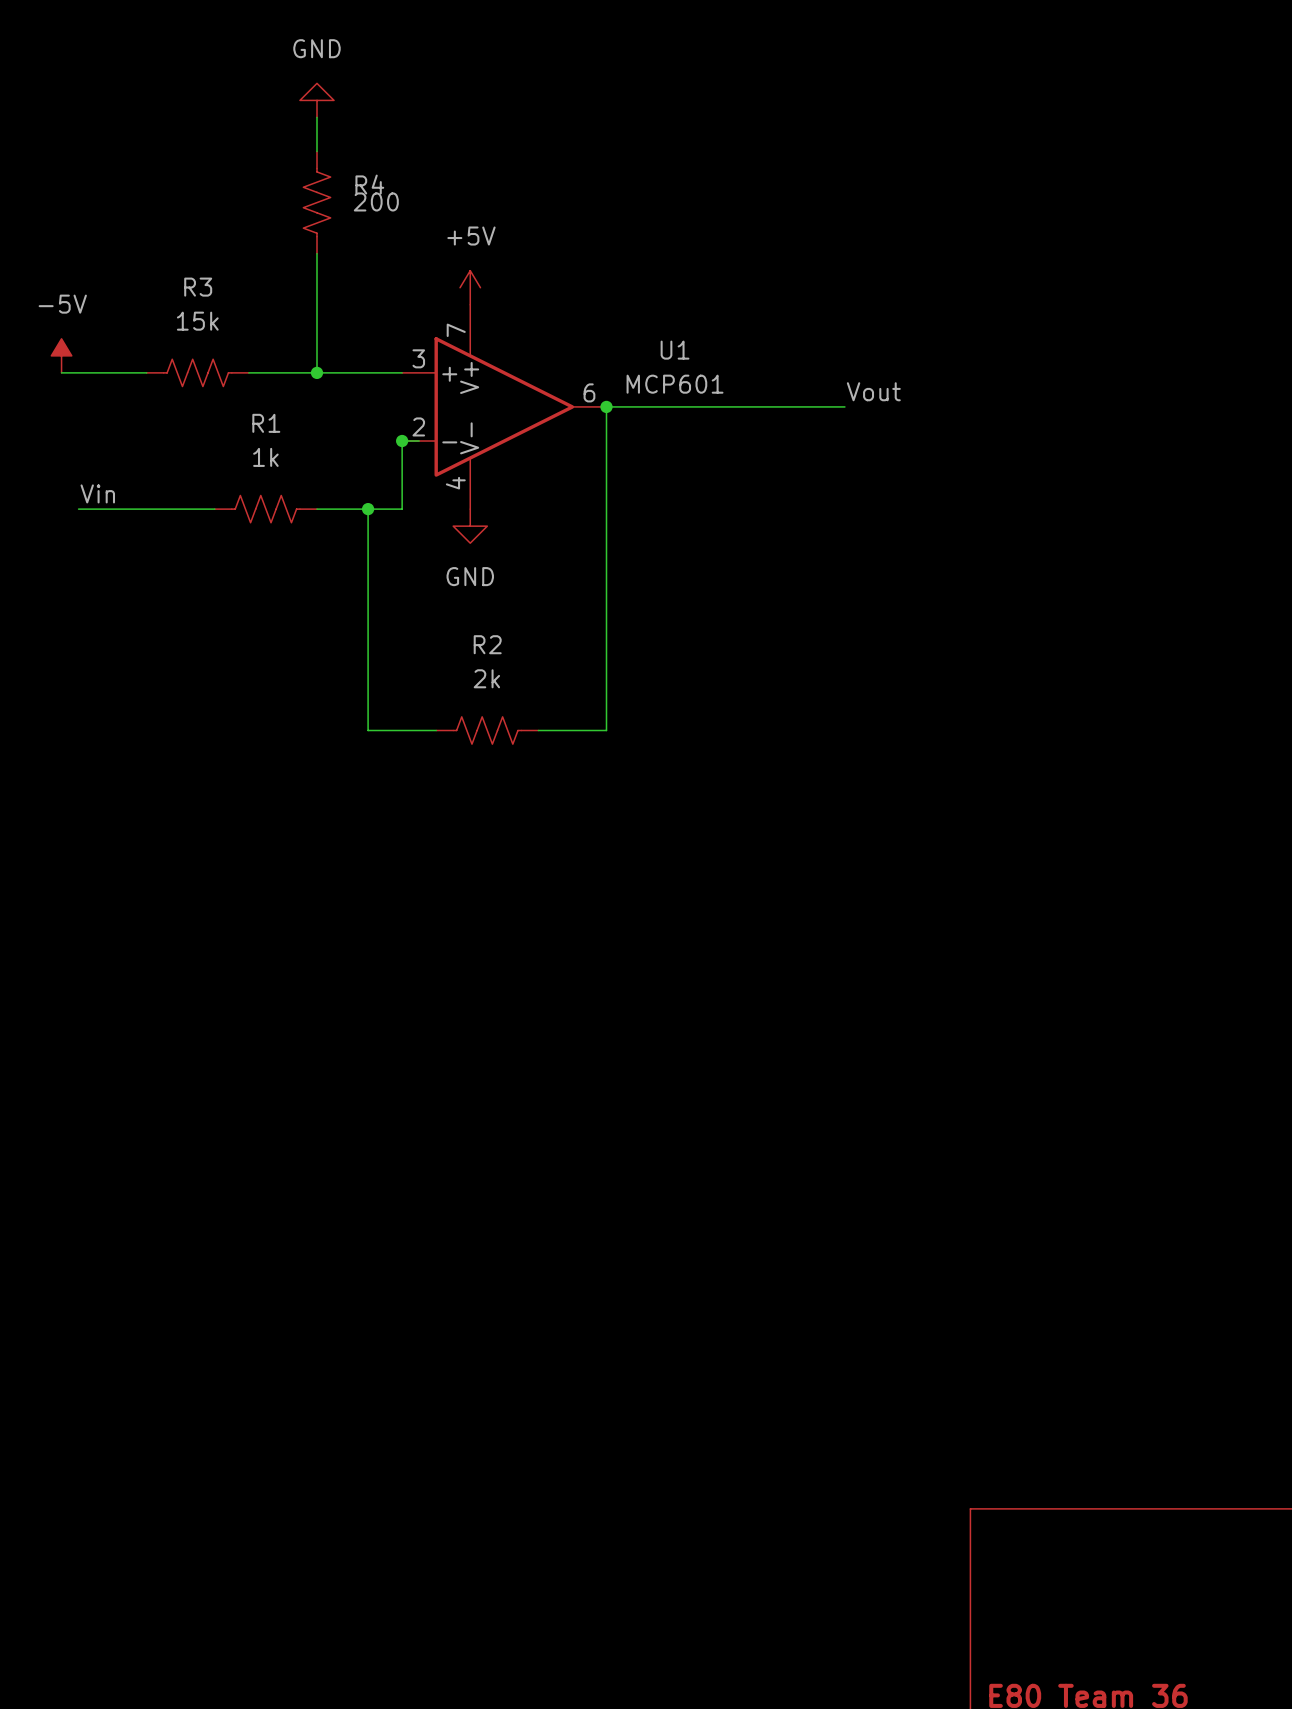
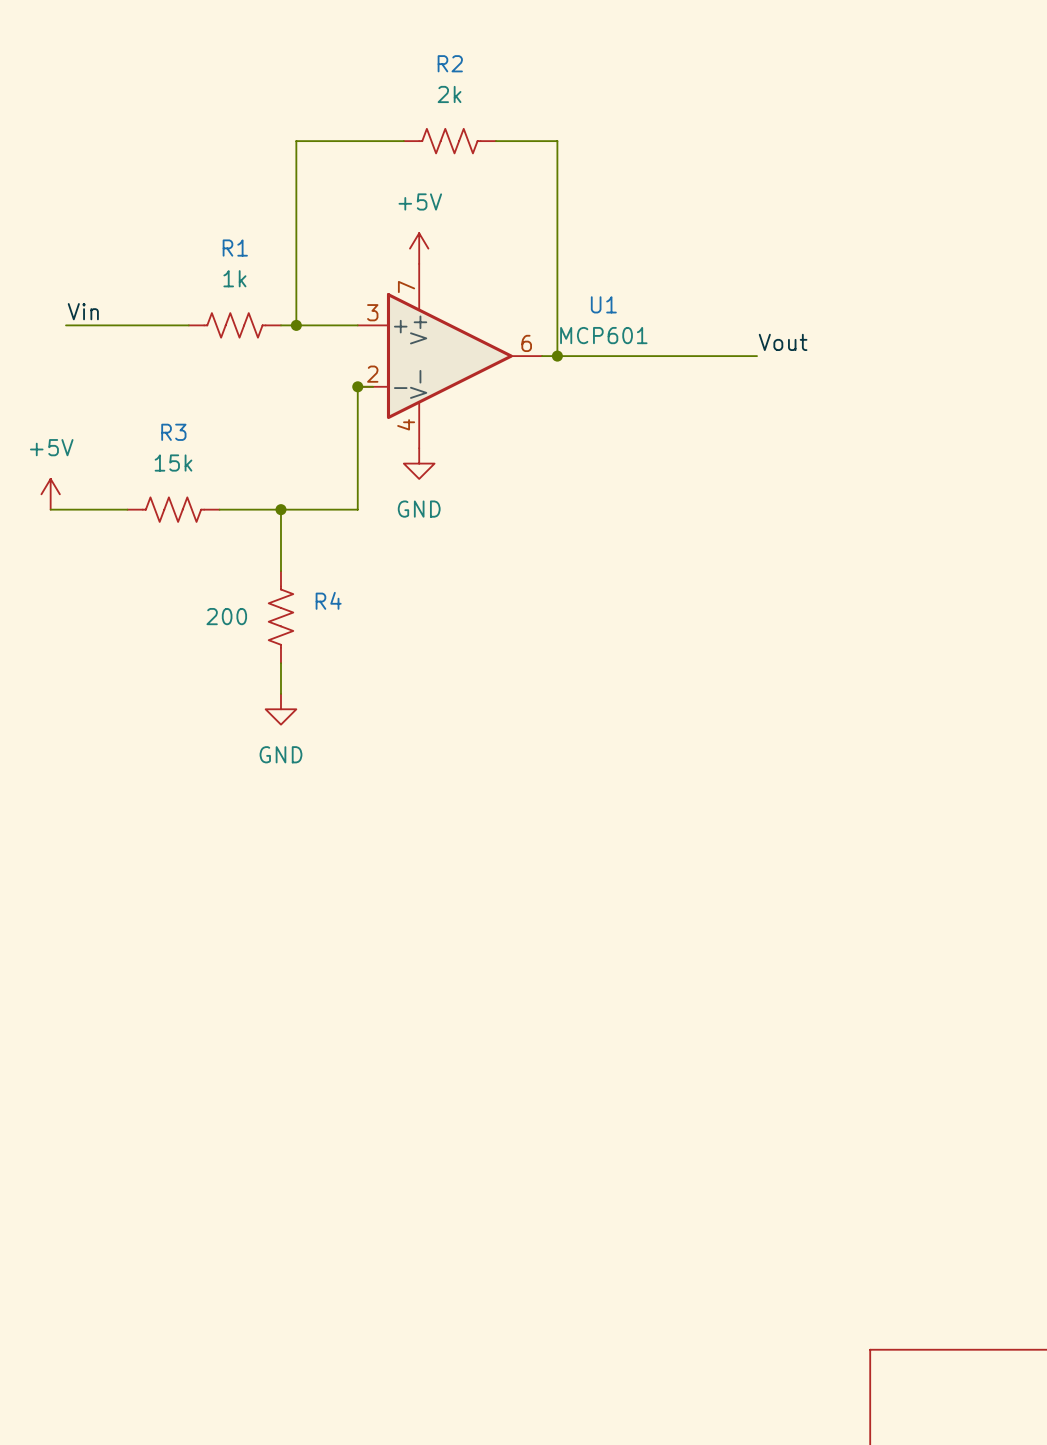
power symbol: GND (316, 100) -> none
wire: (316, 117) (316, 151) -> none
wire: none -> (403, 141) (296, 141) (296, 325)
wire: none -> (495, 141) (557, 141) (557, 356)
R4 value position: 200 (376, 201) -> 200 (226, 616)
R4 position: (316, 202) -> (280, 617)
wire: (316, 253) (316, 372) (248, 372) -> none
power symbol: -5V (61, 355) -> none
wire: (61, 372) (78, 372) -> none
wire: none -> (127, 325) (188, 325)
R3 position: (197, 372) -> (173, 509)
junction position: (316, 372) -> (296, 325)
wire: (606, 406) (606, 730) (538, 730) -> none
junction position: (606, 406) -> (557, 356)
label position: Vin (97, 493) -> Vin (83, 311)
wire: (78, 509) (214, 509) -> none
R1 position: (265, 509) -> (234, 325)
wire: (316, 509) (402, 509) -> (219, 509) (357, 509) (357, 448)
wire: (368, 509) (368, 730) (436, 730) -> none
junction: (368, 509) -> none
power symbol: none -> +5V (50, 494)
wire: none -> (50, 509) (127, 509)
wire: none -> (280, 509) (280, 571)
junction: none -> (280, 509)
R2 position: (487, 730) -> (449, 141)
wire: none -> (280, 663) (280, 693)
power symbol: none -> GND (280, 709)

